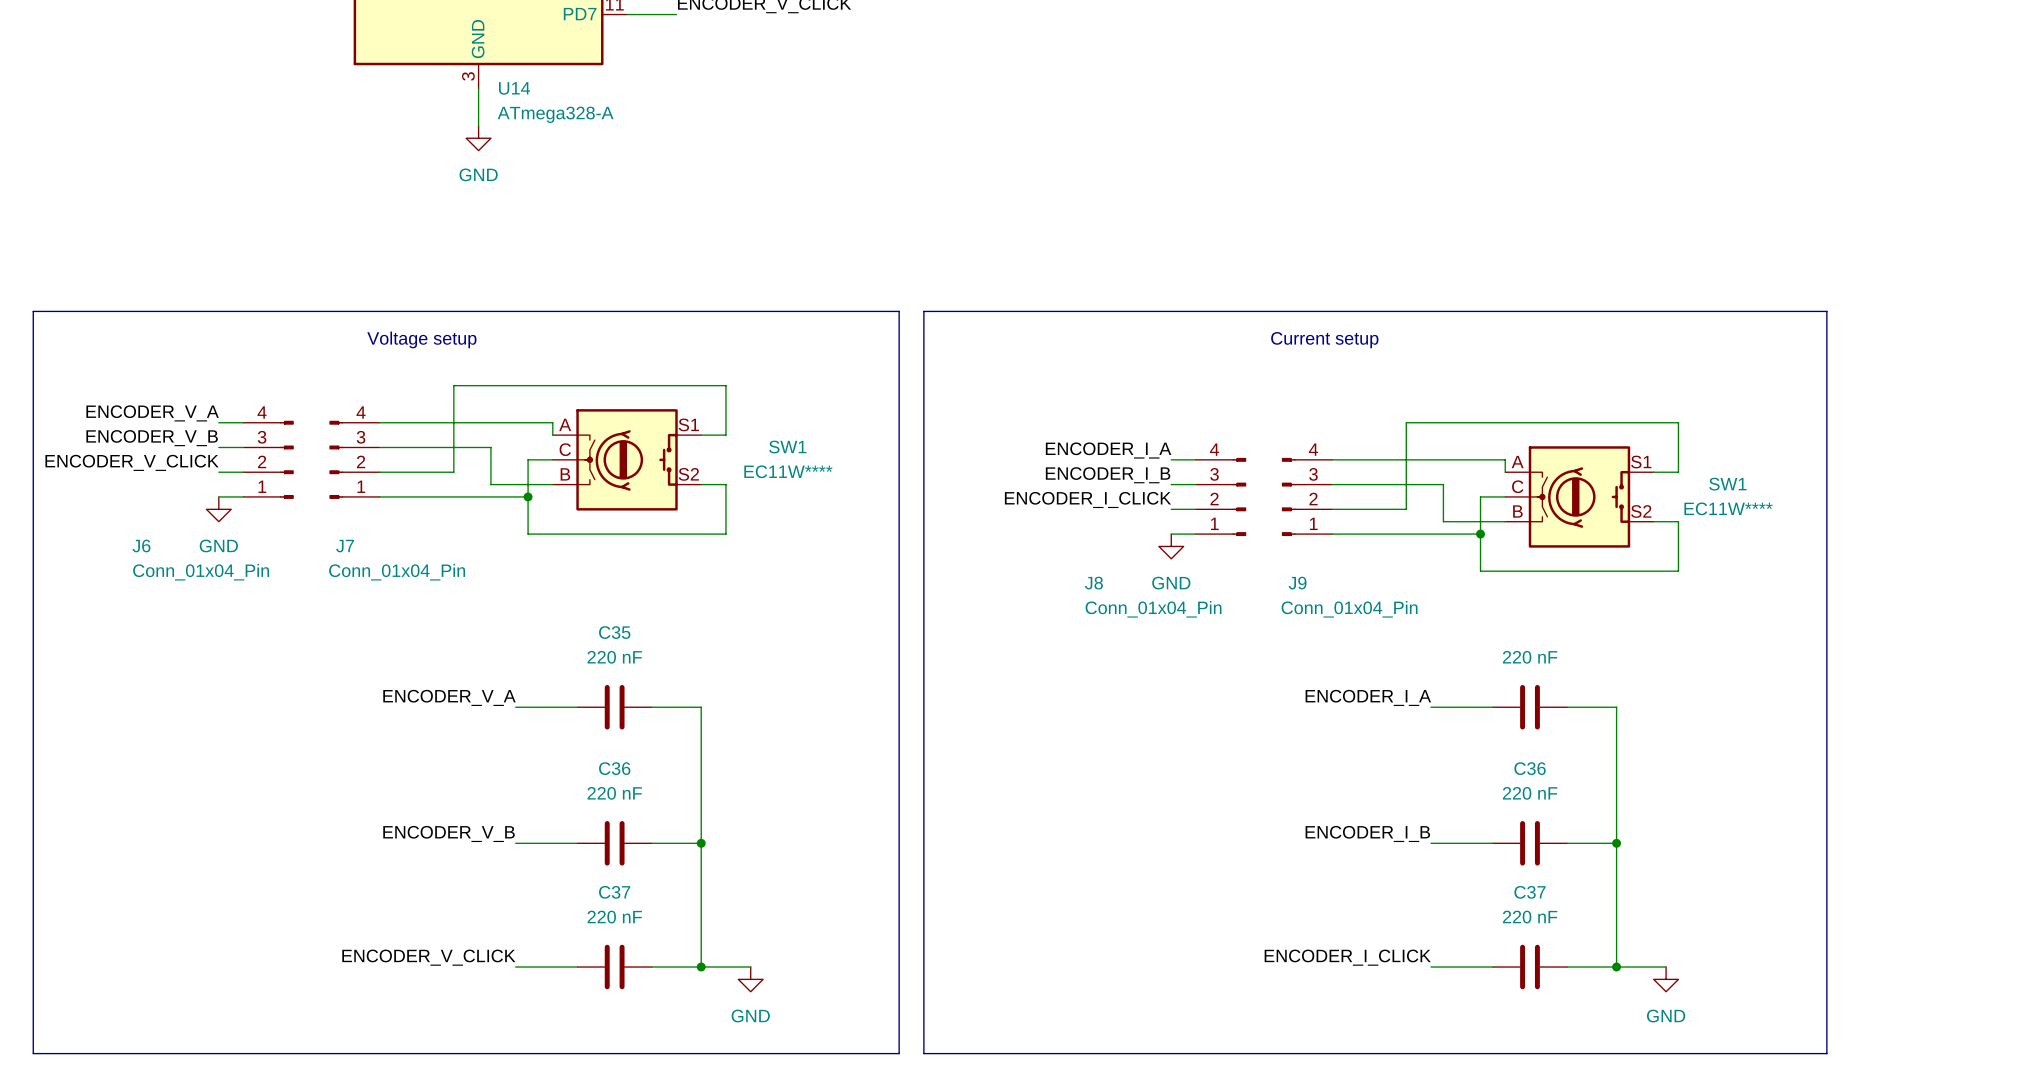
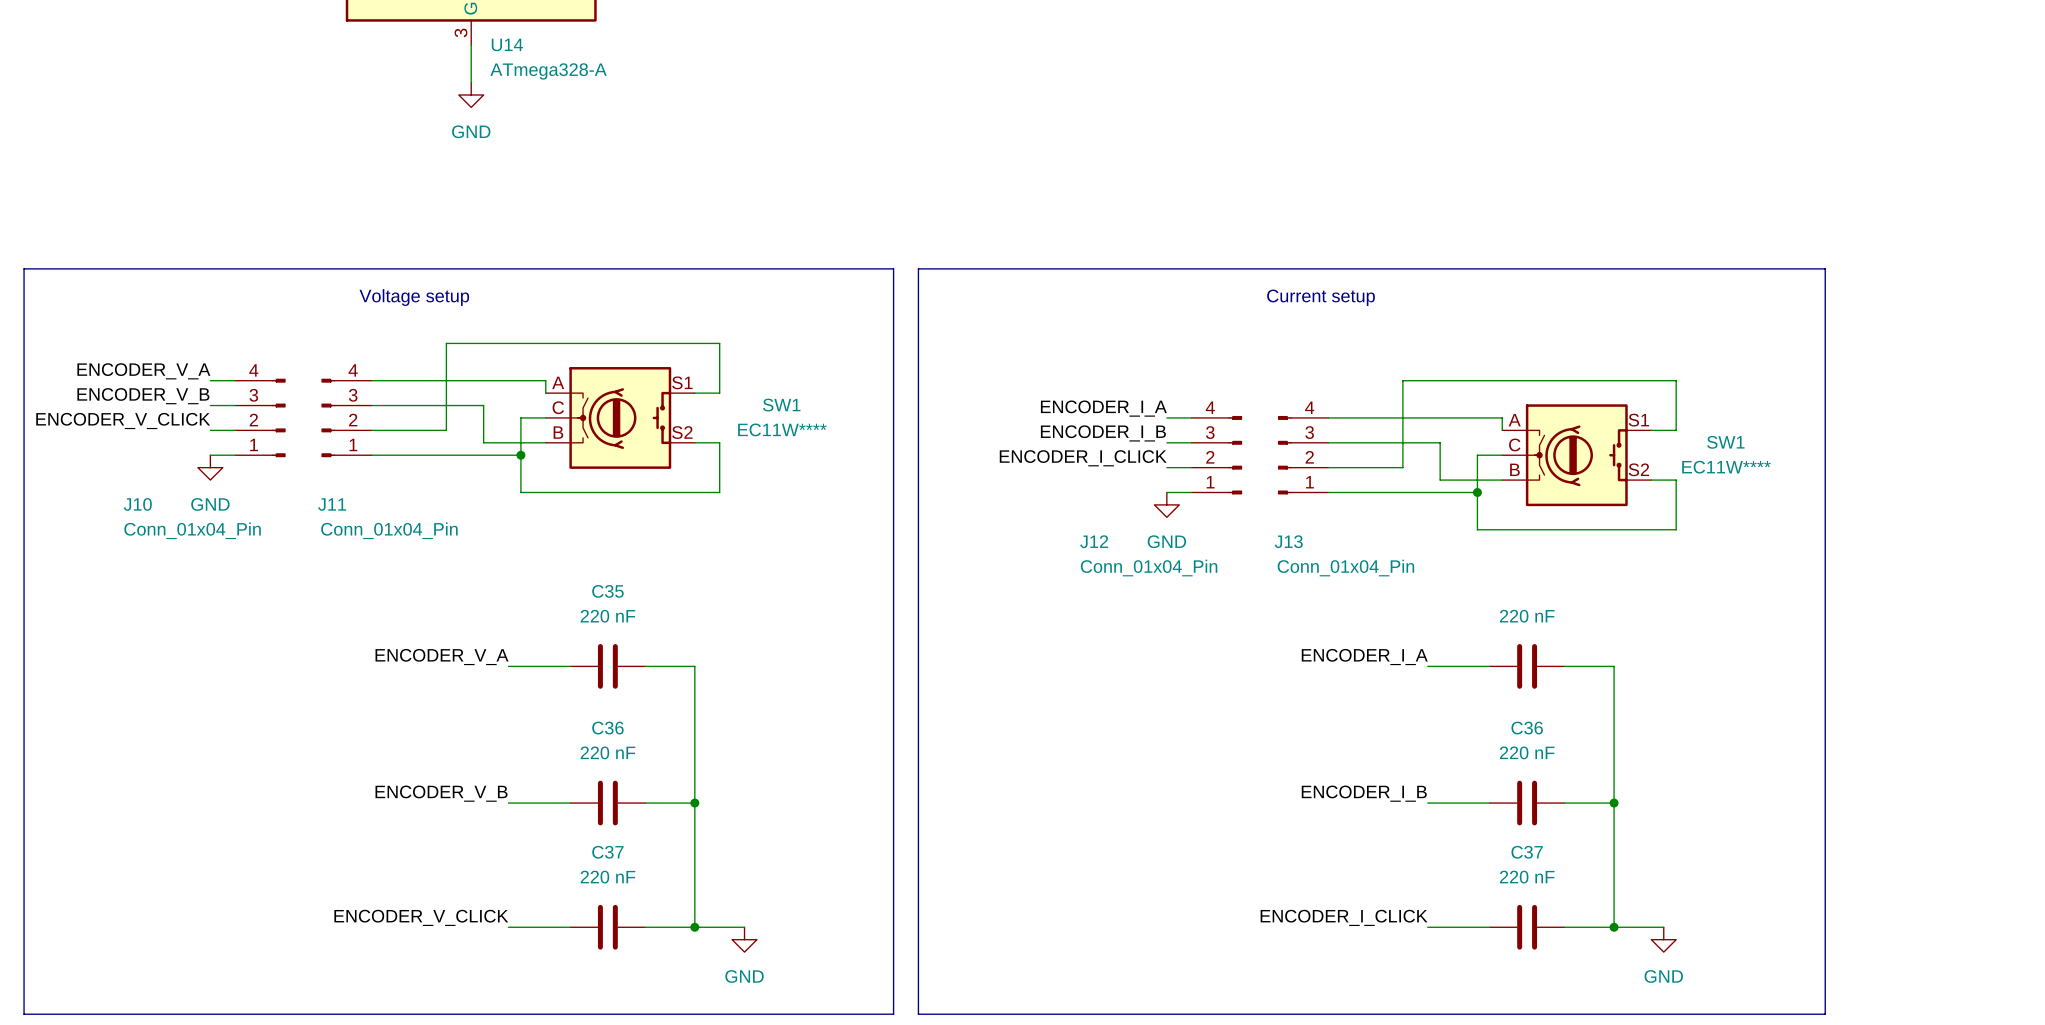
J6 name: J6 (141, 545) -> J10 (137, 504)
J7 name: J7 (345, 546) -> J11 (332, 504)
J8 name: J8 (1093, 583) -> J12 (1094, 541)
J9 name: J9 (1297, 583) -> J13 (1288, 541)

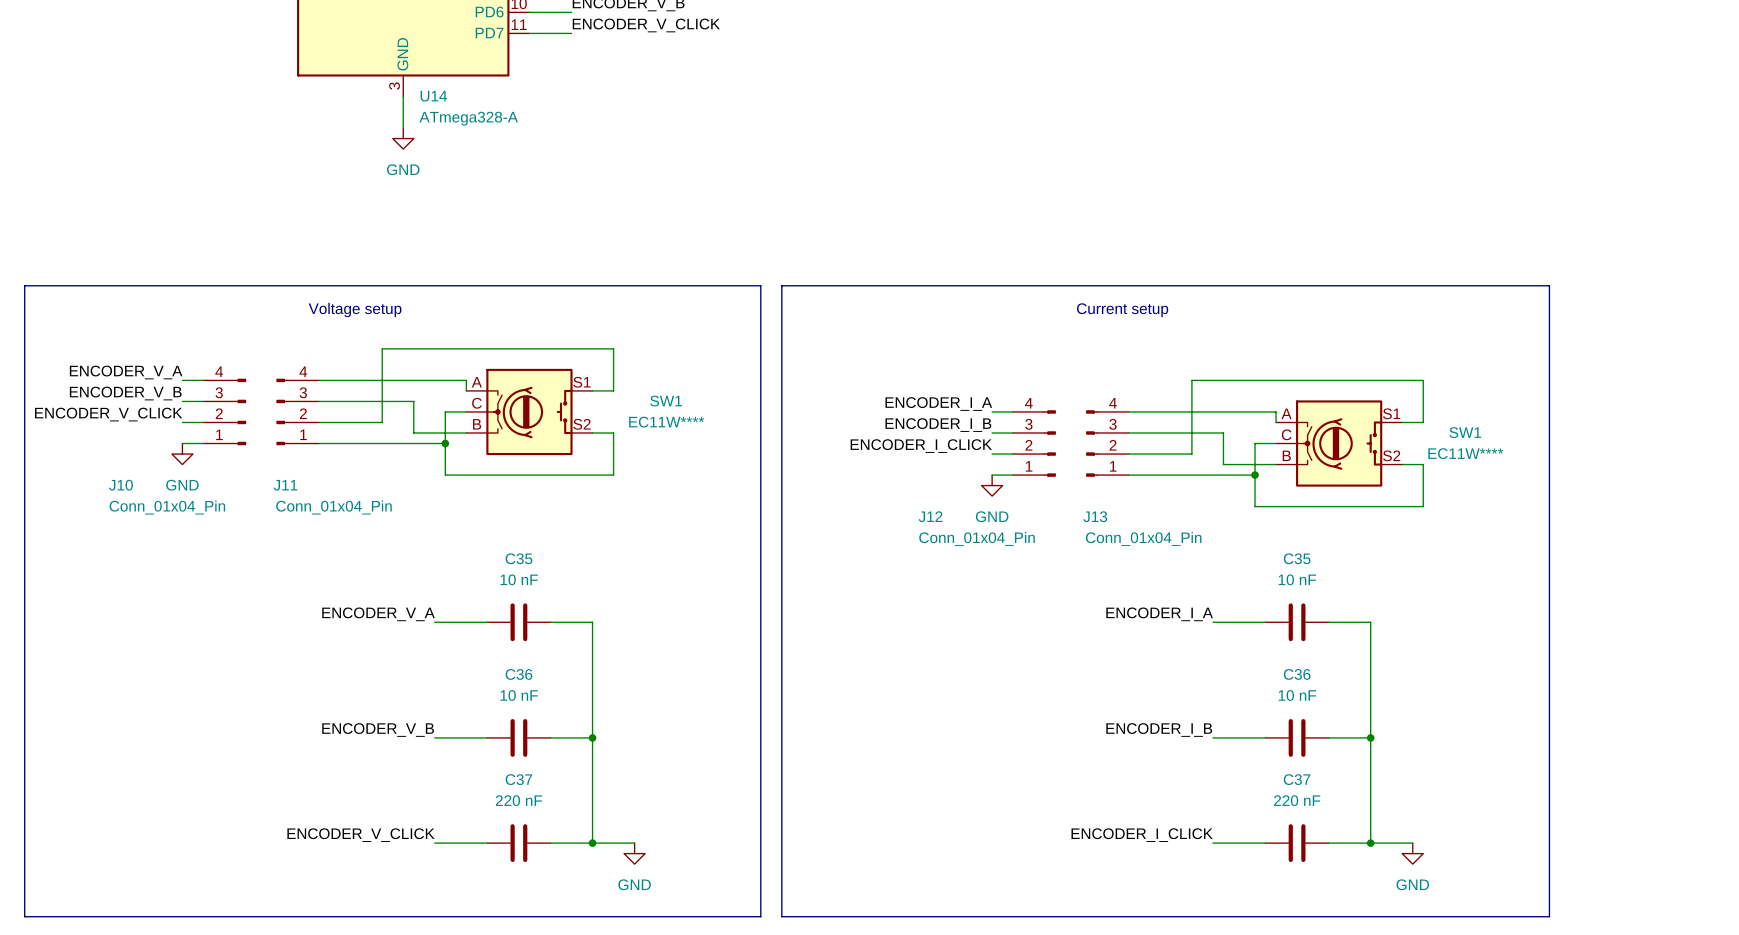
C35 name: none -> C35 (1297, 558)
C35 value: 220 nF (607, 616) -> 10 nF (519, 579)
C35 value: 220 nF (1527, 616) -> 10 nF (1297, 579)
C36 value: 220 nF (607, 752) -> 10 nF (519, 695)
C36 value: 220 nF (1527, 752) -> 10 nF (1297, 695)

